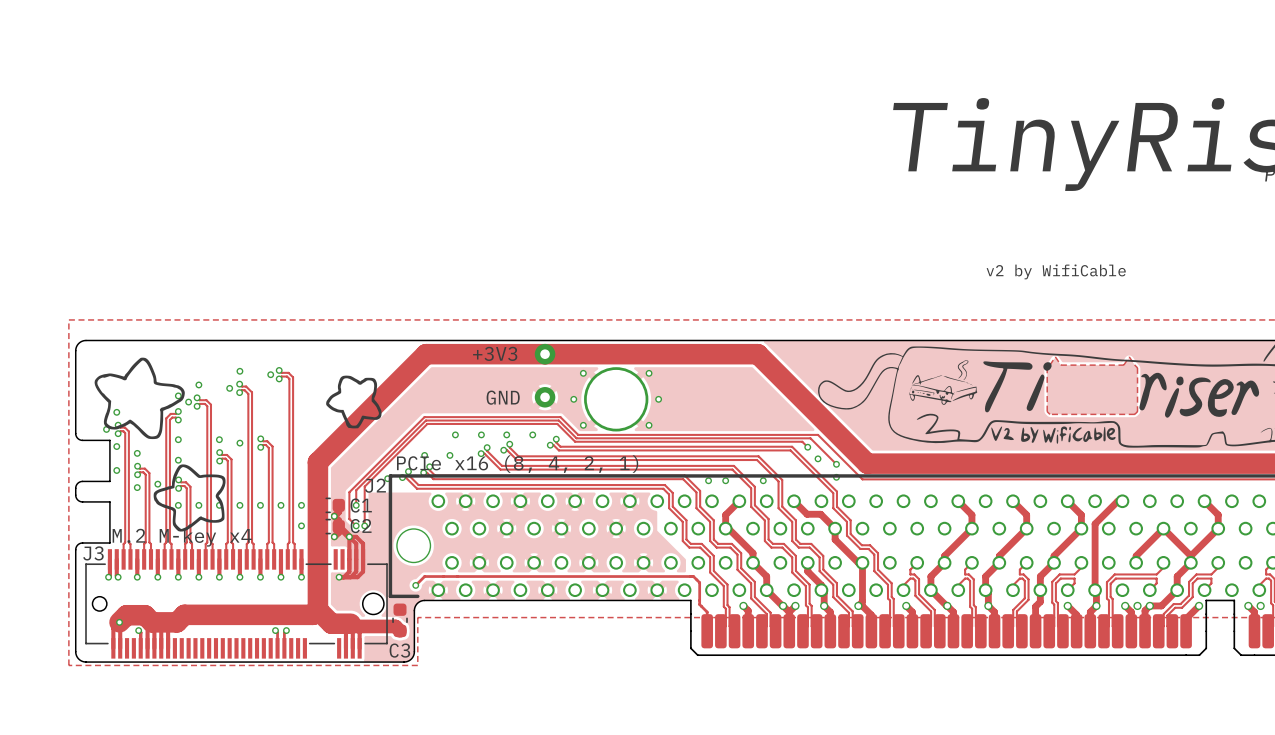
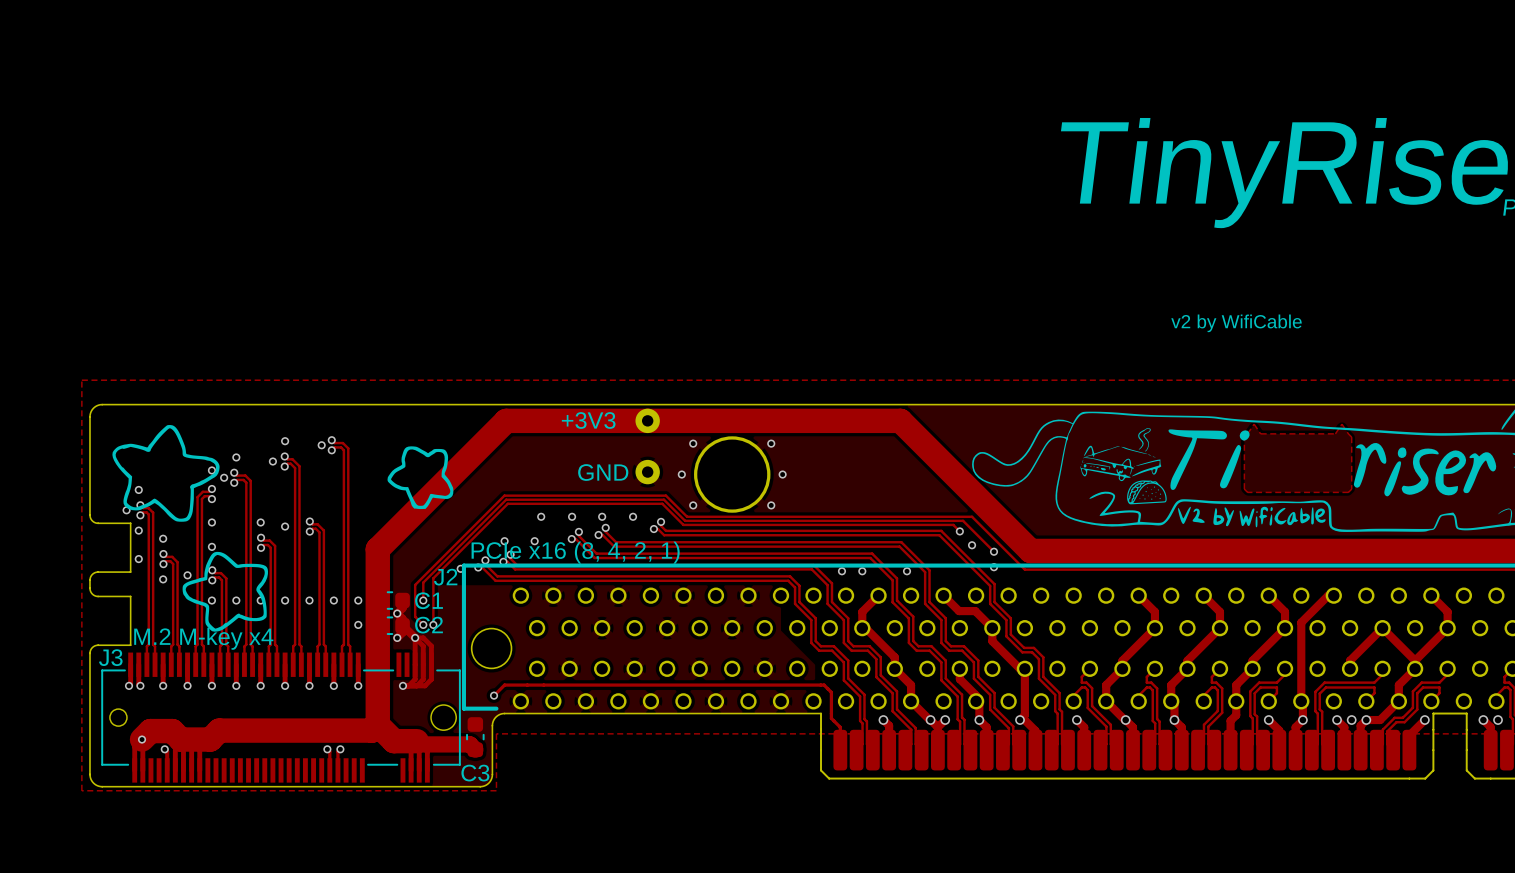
drawing: none -> [1127, 480, 1167, 505]

